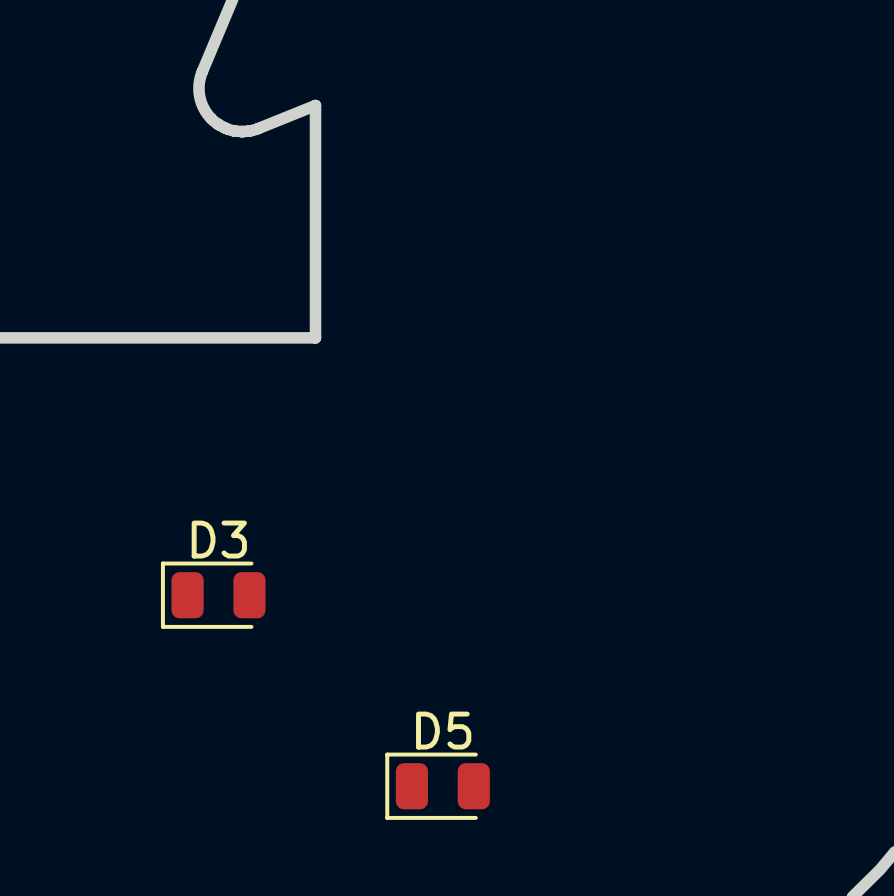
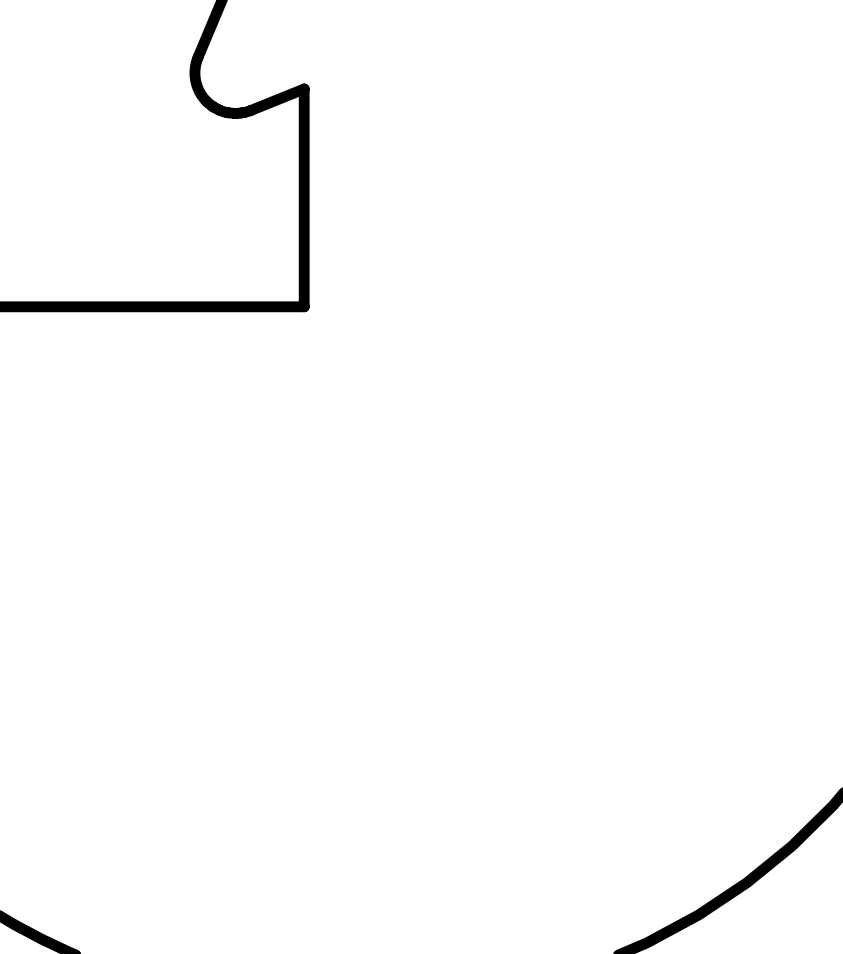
D3: (213, 595) -> none
D5: (437, 786) -> none

